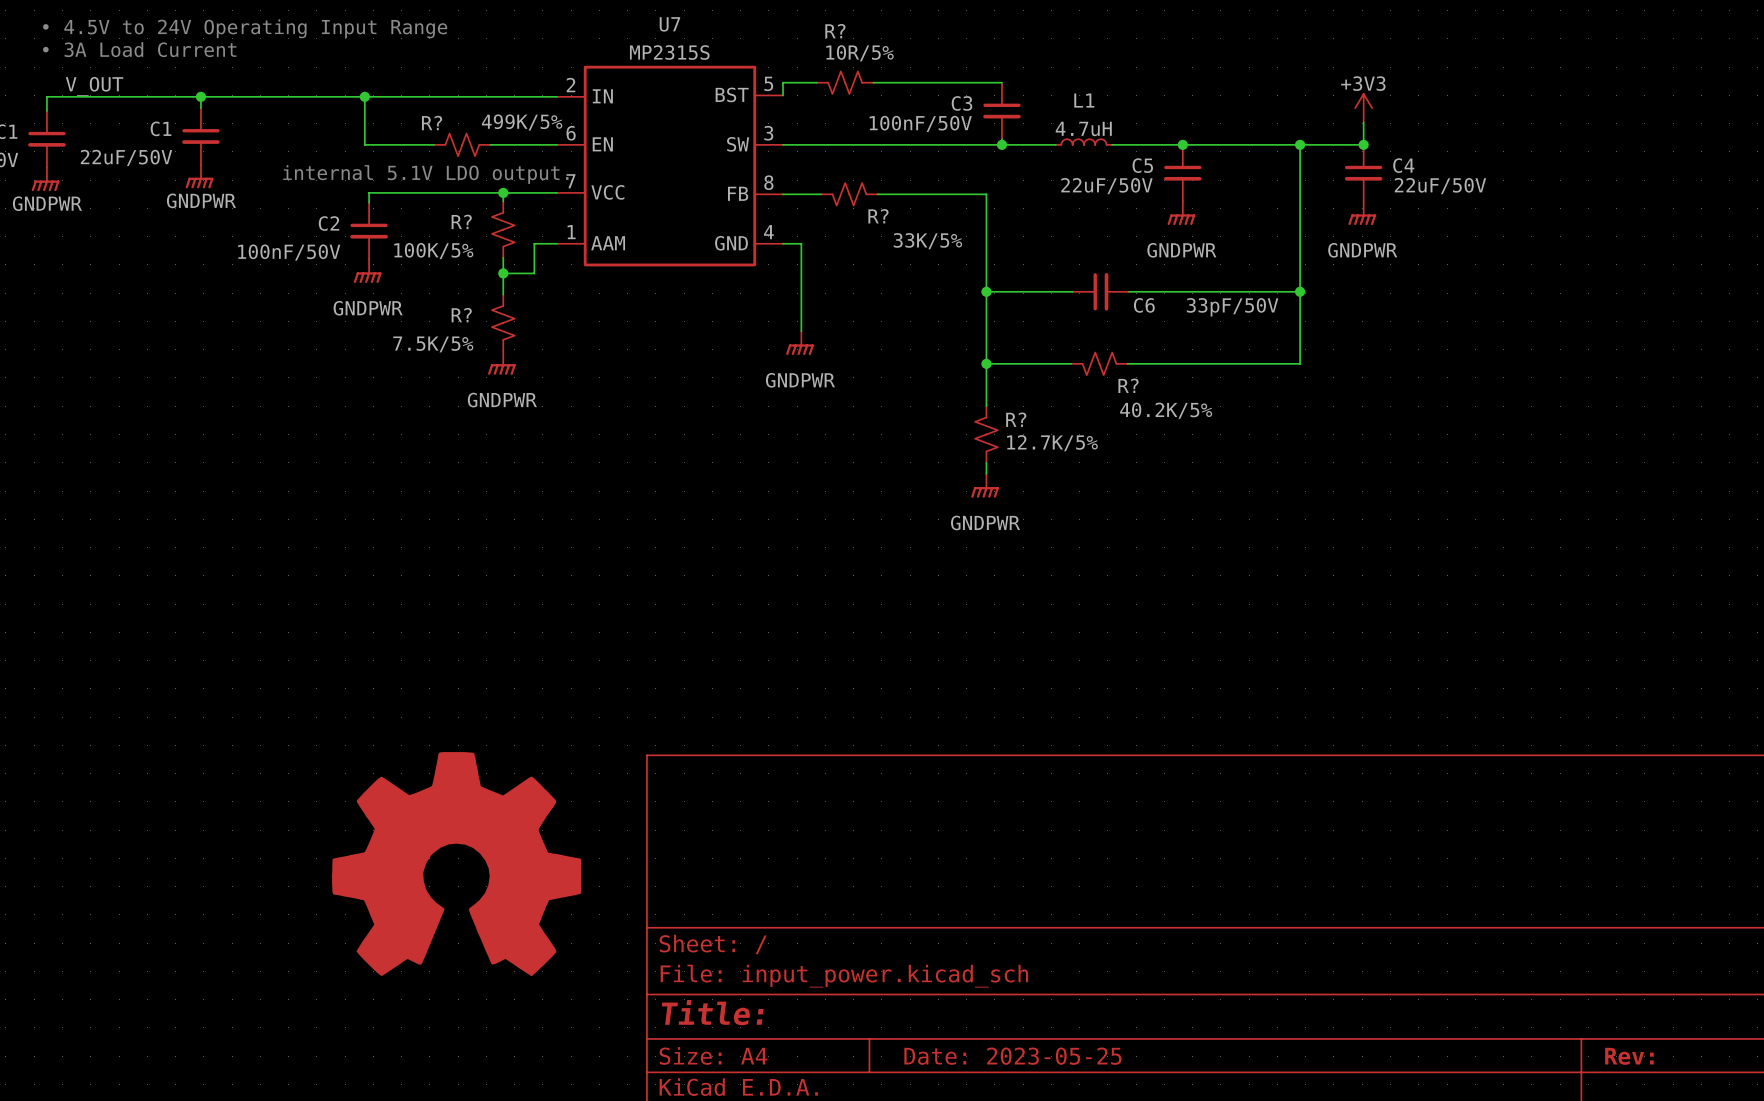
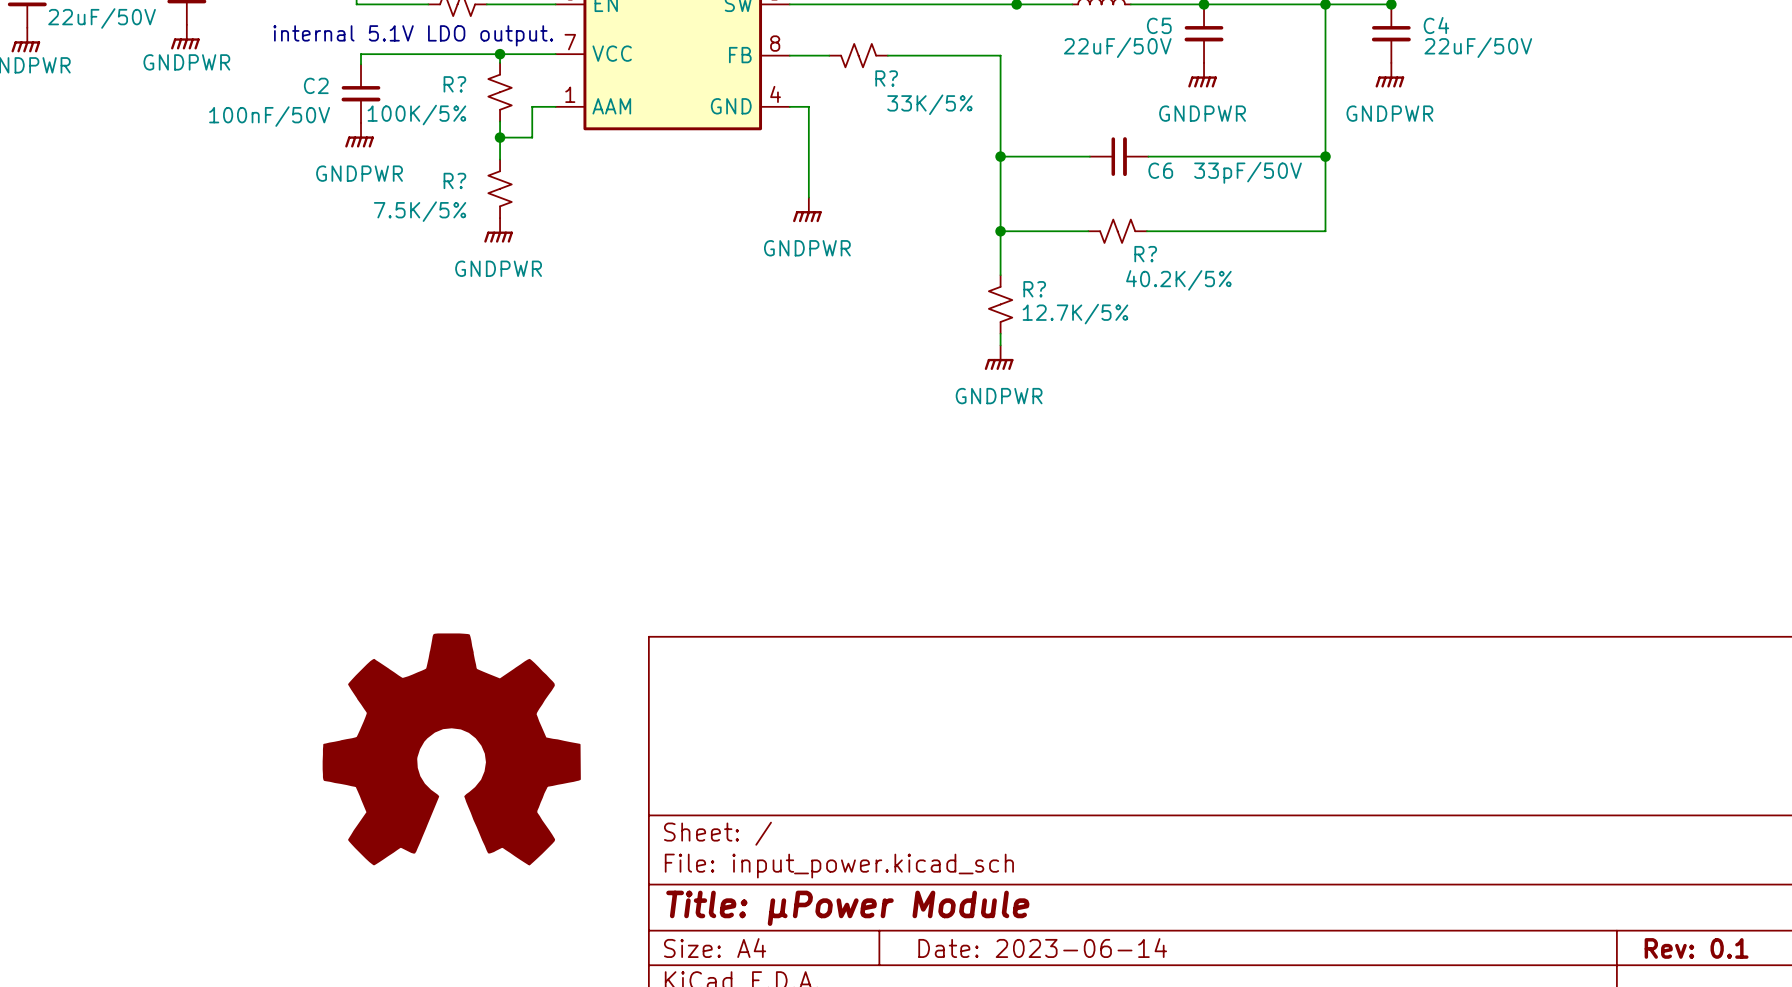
title block: Title: (712, 1012) -> Title: µPower Module (847, 908)
title block: Date: 2023-05-25 (1012, 1056) -> Date: 2023-06-14 (1042, 948)
title block: Rev: (1629, 1056) -> Rev: 0.1 (1696, 948)

